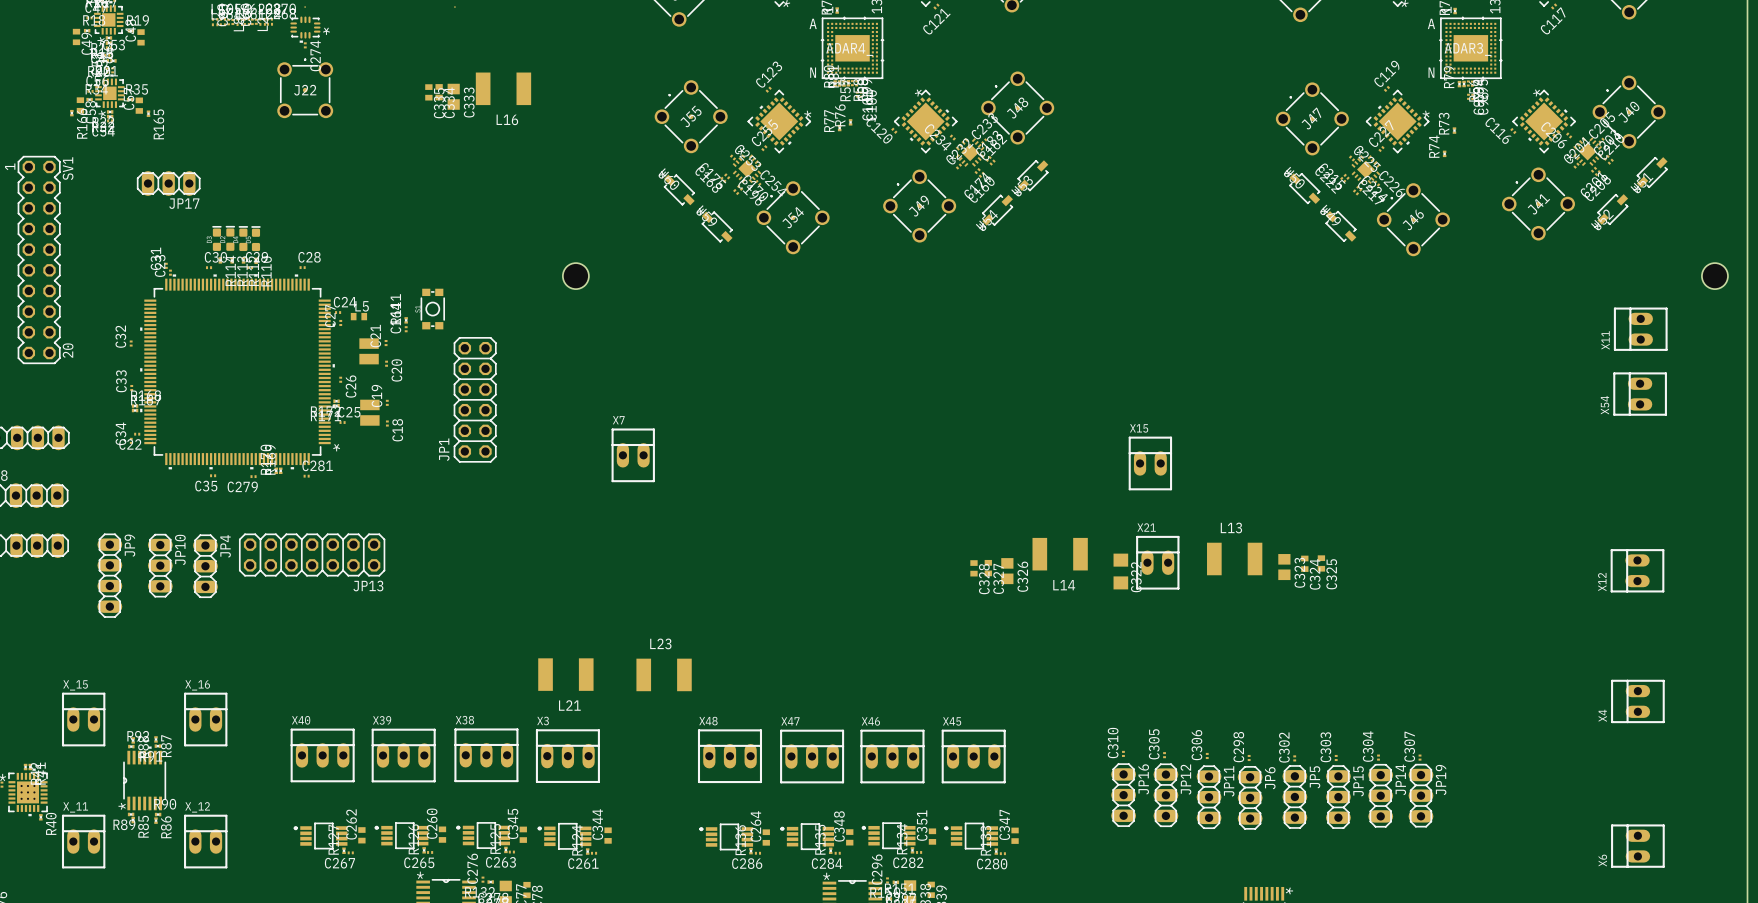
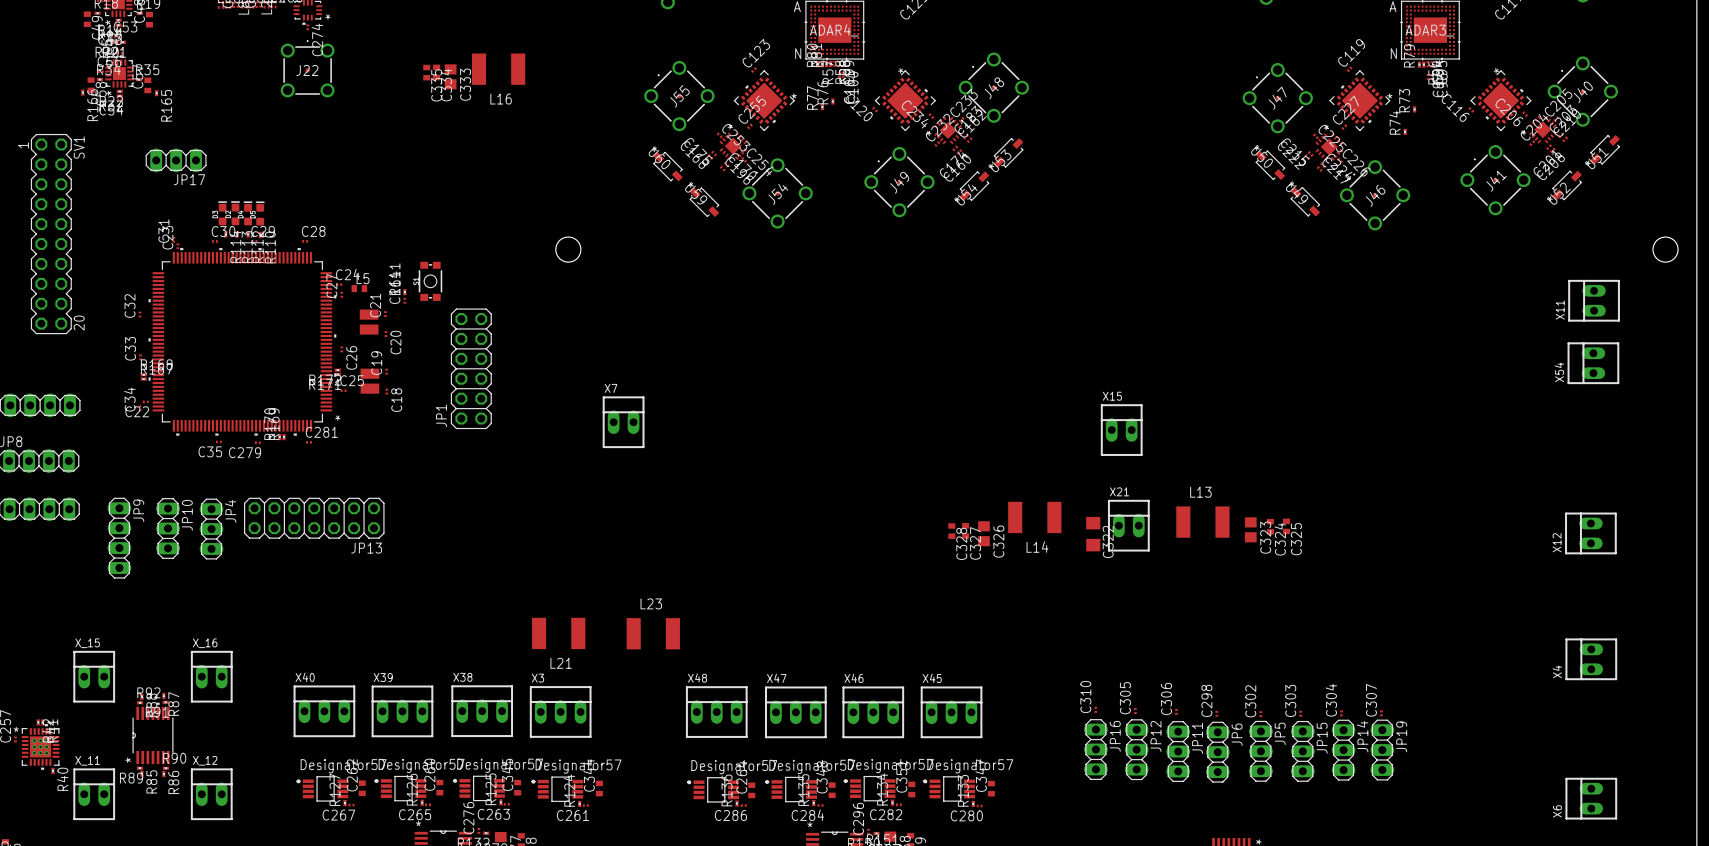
part text: none -> Designator57 (343, 766)
part text: none -> Designator57 (421, 765)
part text: none -> Designator57 (500, 765)
part text: none -> Designator57 (890, 766)
part text: none -> Designator57 (578, 766)
part text: none -> Designator57 (734, 767)
part text: none -> Designator57 (812, 766)
part text: none -> Designator57 (970, 766)

